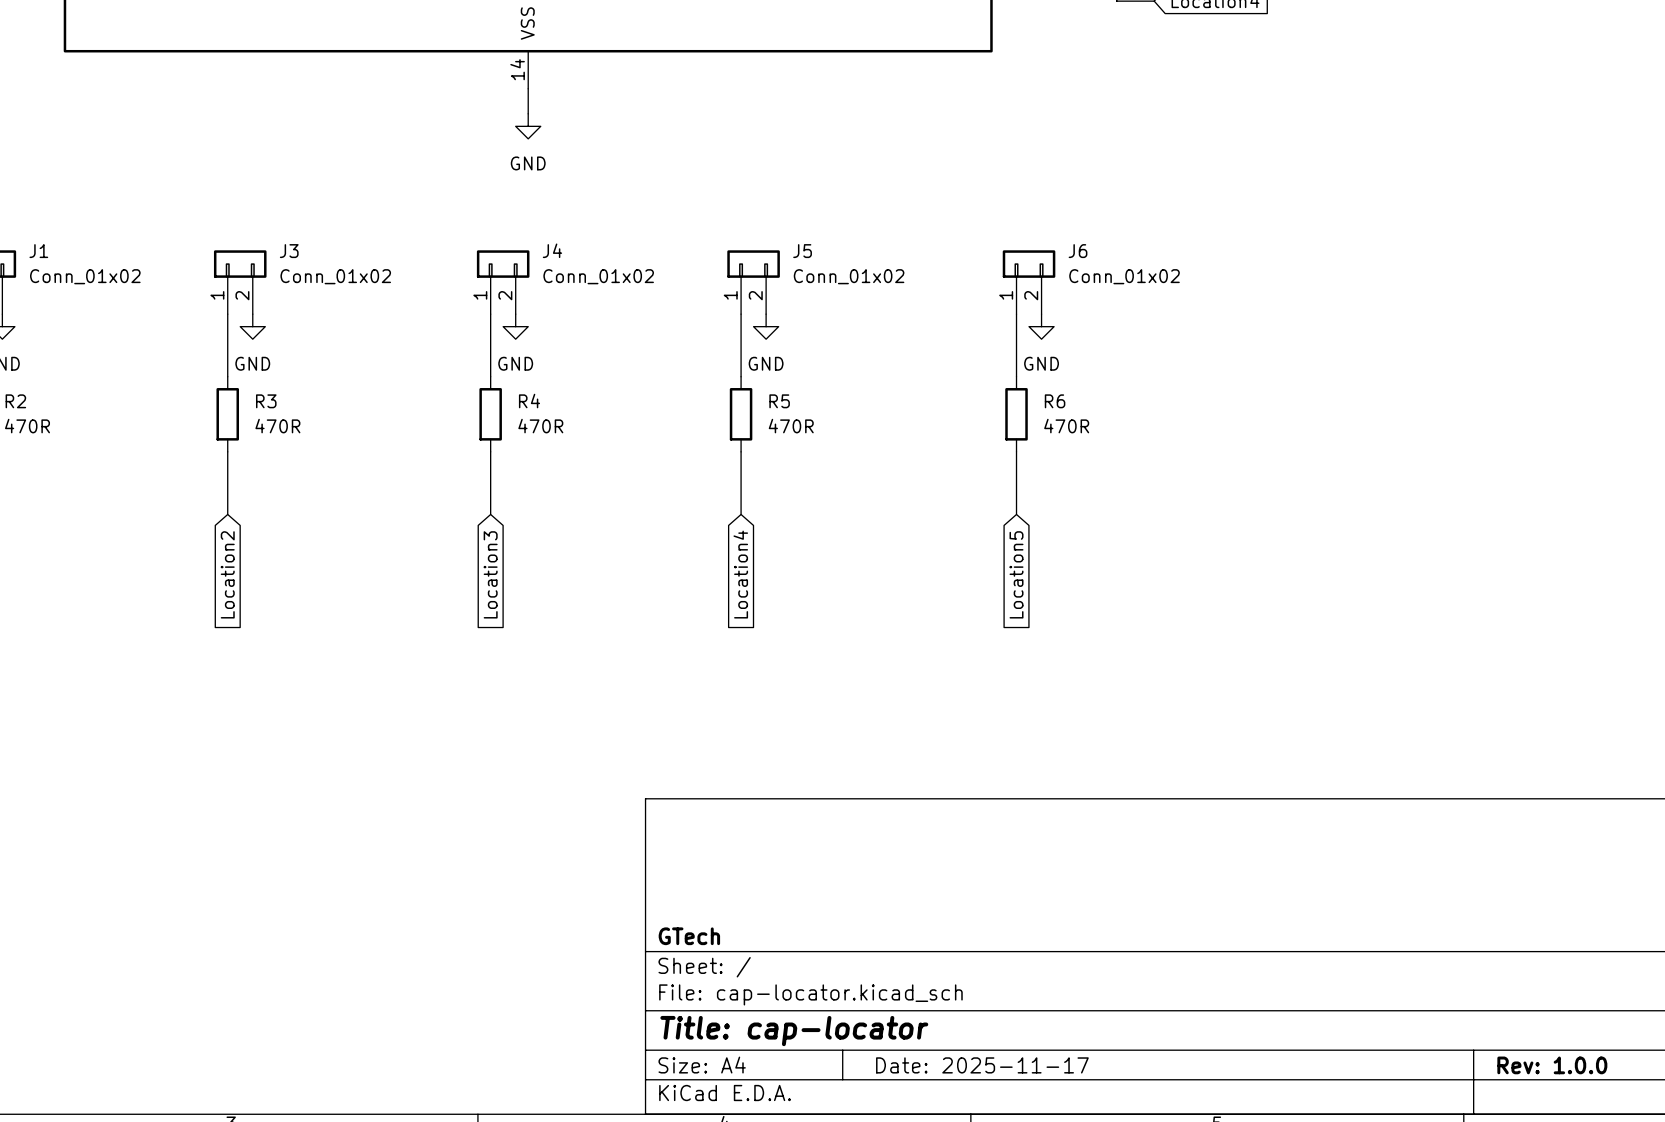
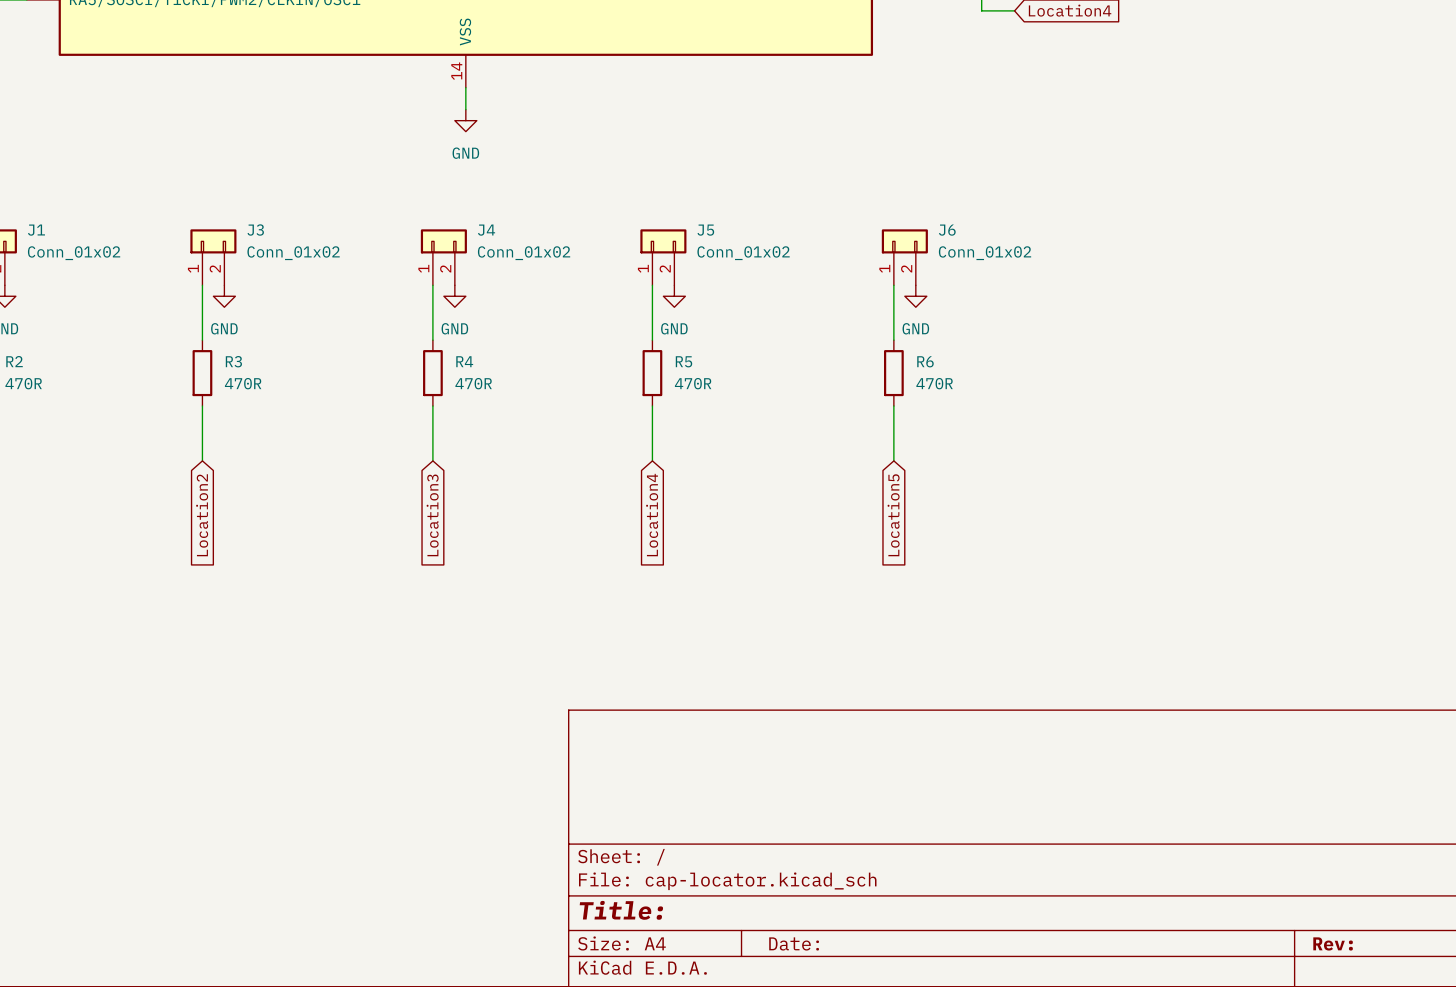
title block: GTech (689, 936) -> none
title block: Title: cap-locator (794, 1031) -> Title: (621, 910)
title block: Date: 2025-11-17 (982, 1065) -> Date: (794, 943)
title block: Rev: 1.0.0 (1552, 1065) -> Rev: (1333, 943)

